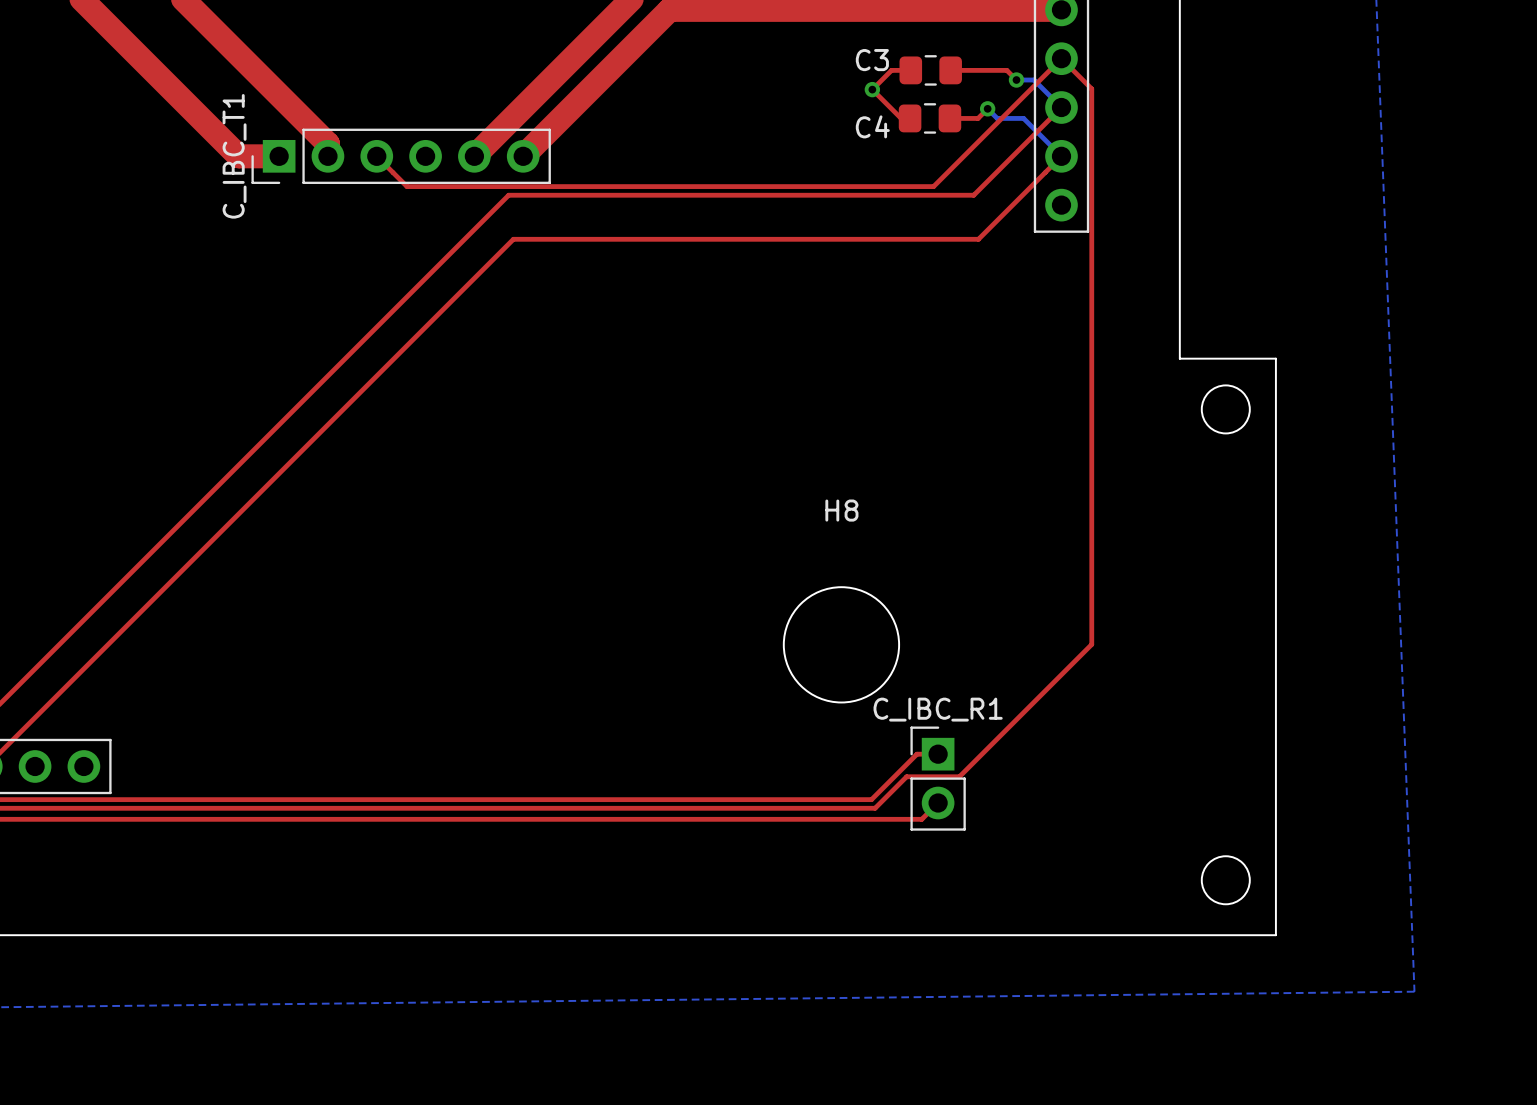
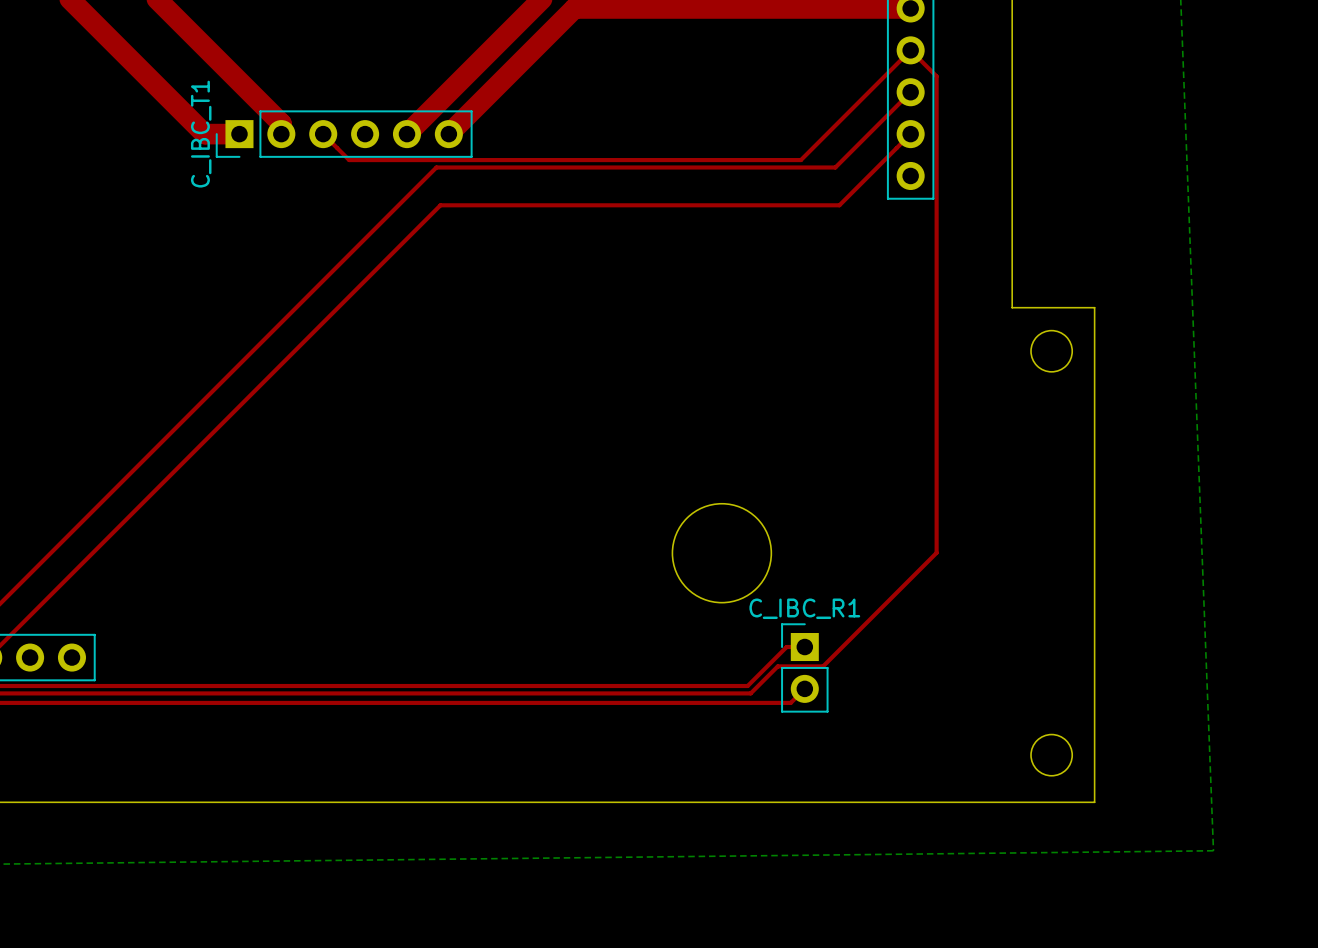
top track: (910, 70) (891, 70) (872, 89) (901, 118) (910, 118) -> none
C3: (930, 70) -> none
top track: (950, 70) (1006, 70) (1016, 80) -> none
bottom track: (1016, 80) (1034, 80) (1061, 107) -> none
via: (1016, 80) -> none
via: (872, 89) -> none
top track: (987, 108) (978, 118) (949, 118) -> none
bottom track: (987, 108) (997, 118) (1023, 118) (1061, 156) -> none
via: (987, 108) -> none
C4: (930, 118) -> none
H8 name: H8 (841, 510) -> none

